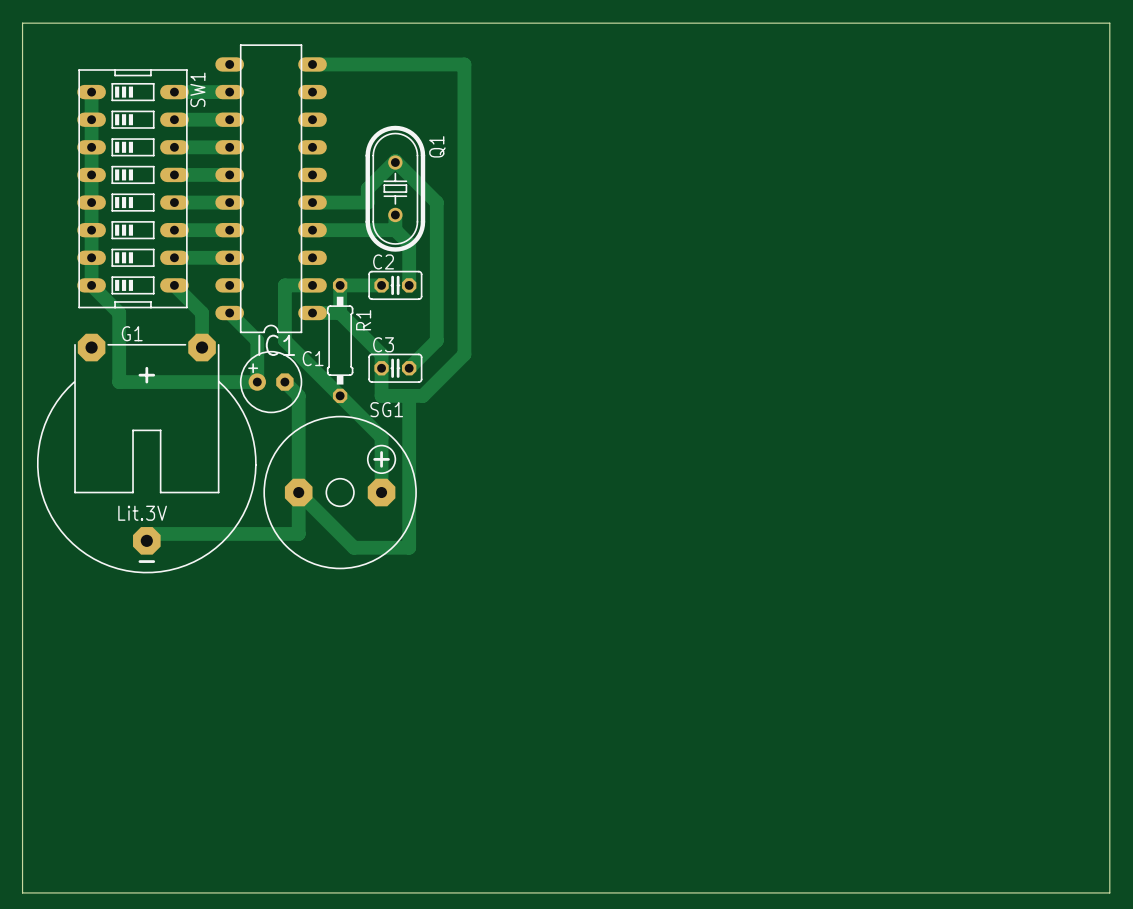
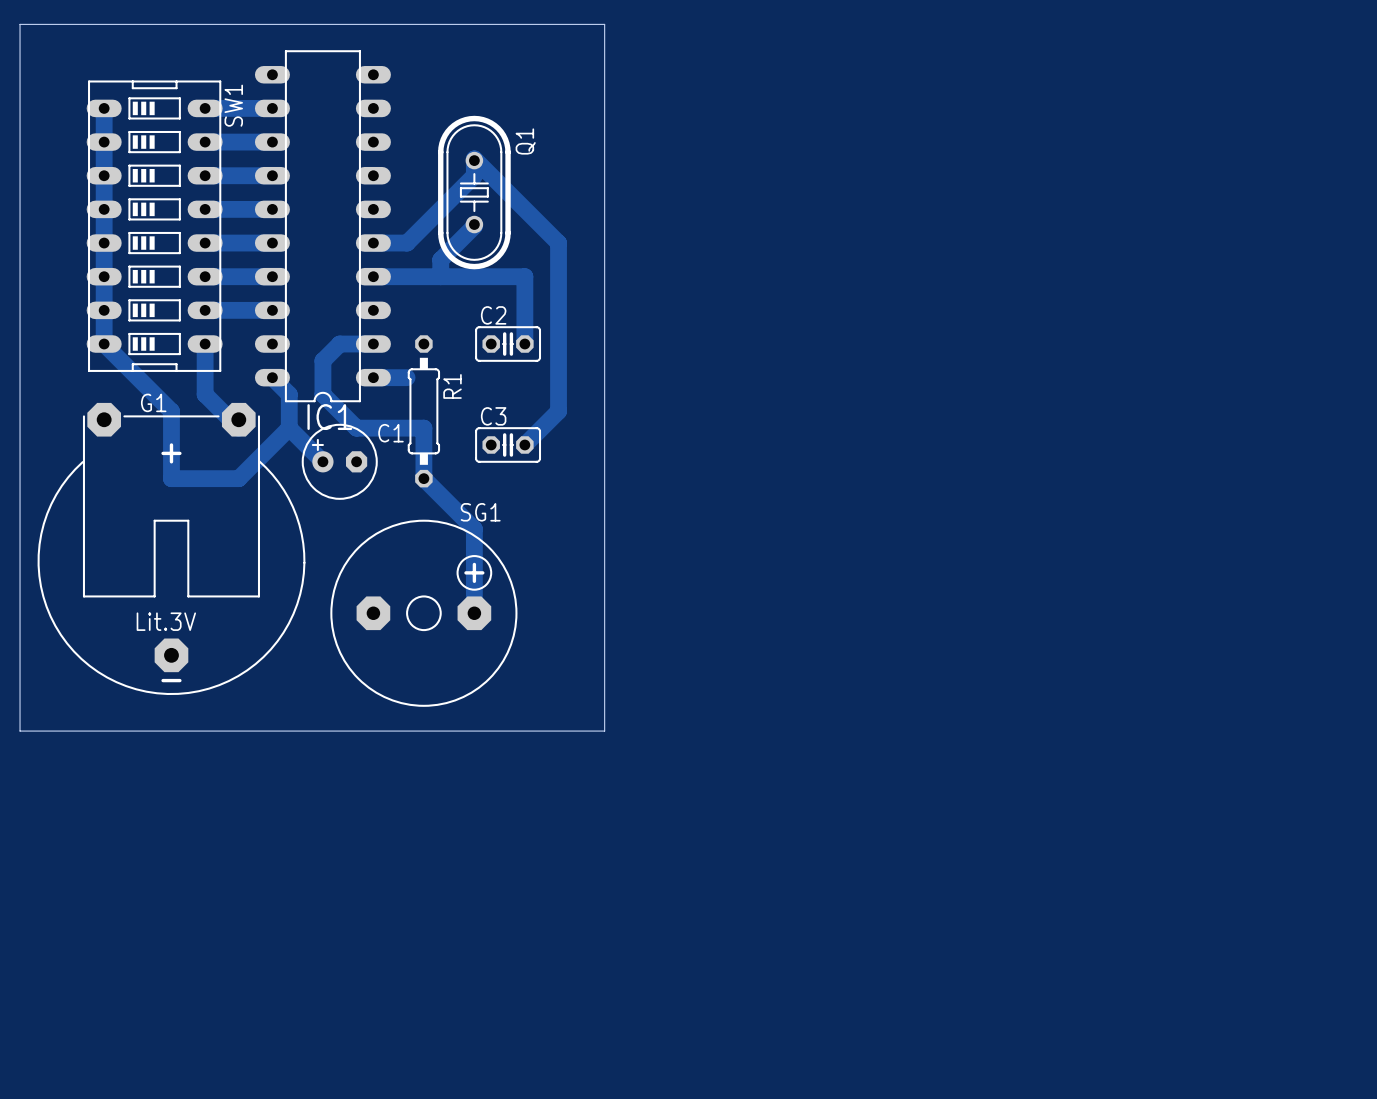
board edge: (502, 23) (1109, 23) (1109, 892) (22, 892) (22, 602) -> (604, 24) (604, 731) (20, 731)
track: (312, 64) (464, 64) (464, 202) -> none
track: (395, 161) (436, 202) (436, 230) -> (474, 276) (524, 276)
track: (395, 161) (367, 188) (367, 202) (340, 202) -> (558, 243) (474, 158) (474, 175) (407, 243)
track: none -> (474, 224) (440, 259) (440, 276)
Q1 position: (395, 188) -> (474, 192)
track: (395, 214) (395, 230) (409, 243) (409, 285) -> none
track: (174, 285) (202, 313) (202, 347) -> (205, 344) (205, 394) (238, 428) (238, 419)
track: (284, 285) (284, 340) -> (339, 344) (322, 360) (322, 394) (339, 411)
track: (381, 285) (340, 285) (340, 313) (381, 354) (381, 395) (422, 395) (464, 354) (464, 340) -> (524, 444) (558, 411)
C2 position: (395, 285) -> (508, 344)
track: (436, 285) (436, 340) (409, 368) -> none
track: (119, 313) (119, 382) (257, 382) (257, 340) (243, 326) -> (137, 377) (171, 411) (171, 478) (238, 478) (289, 428)
track: none -> (289, 394) (289, 428)
R1 position: (340, 340) -> (423, 411)
track: none -> (289, 428) (322, 461)
track: (298, 354) (381, 437) (381, 492) -> (356, 428) (423, 428) (423, 478) (474, 529) (474, 613)
C3 position: (395, 368) -> (508, 444)
C1 position: (271, 382) -> (339, 461)
track: (284, 382) (298, 395) (298, 533) (146, 533) (146, 540) -> none
track: (409, 395) (409, 547) (353, 547) (298, 492) -> none
SG1 position: (340, 492) -> (423, 613)

